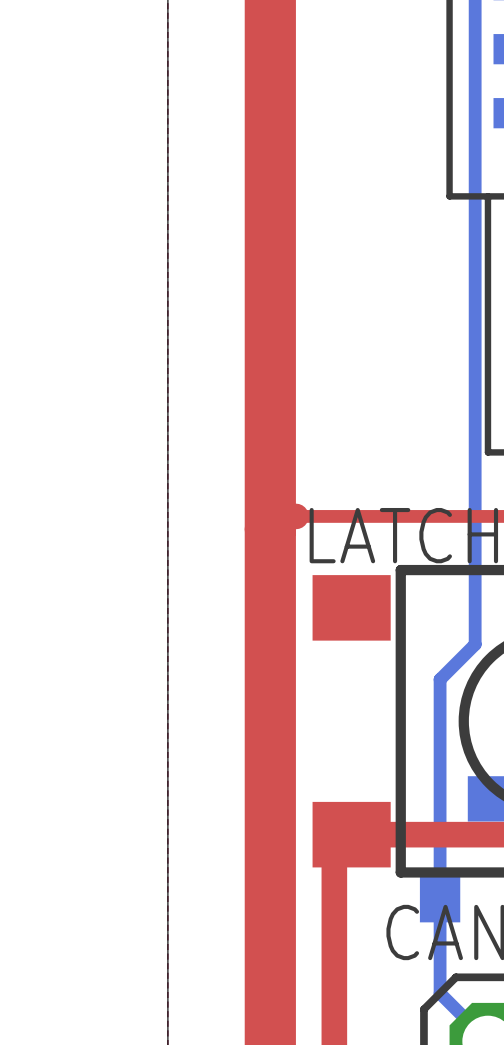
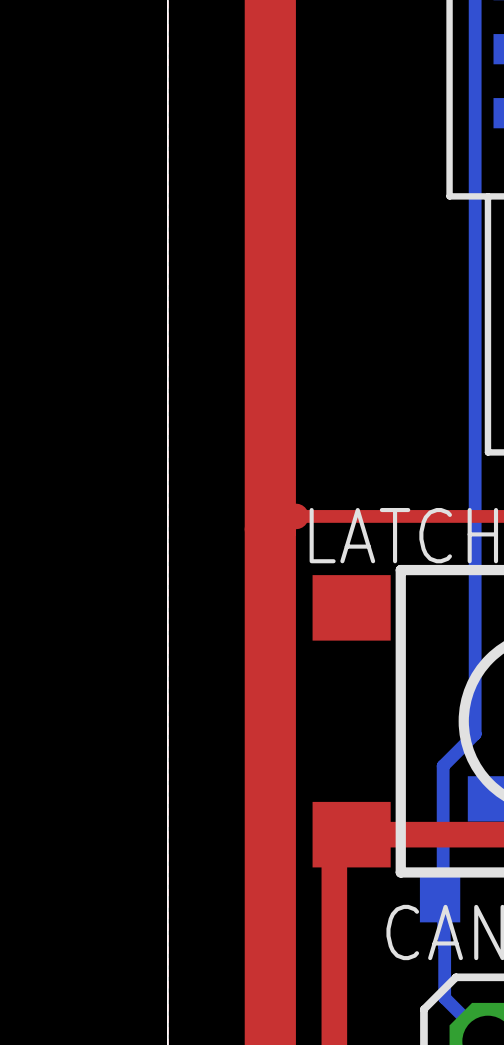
bottom track: (475, 644) (440, 679) (440, 993) (444, 998) -> (475, 644) (475, 734) (443, 766) (444, 998)

